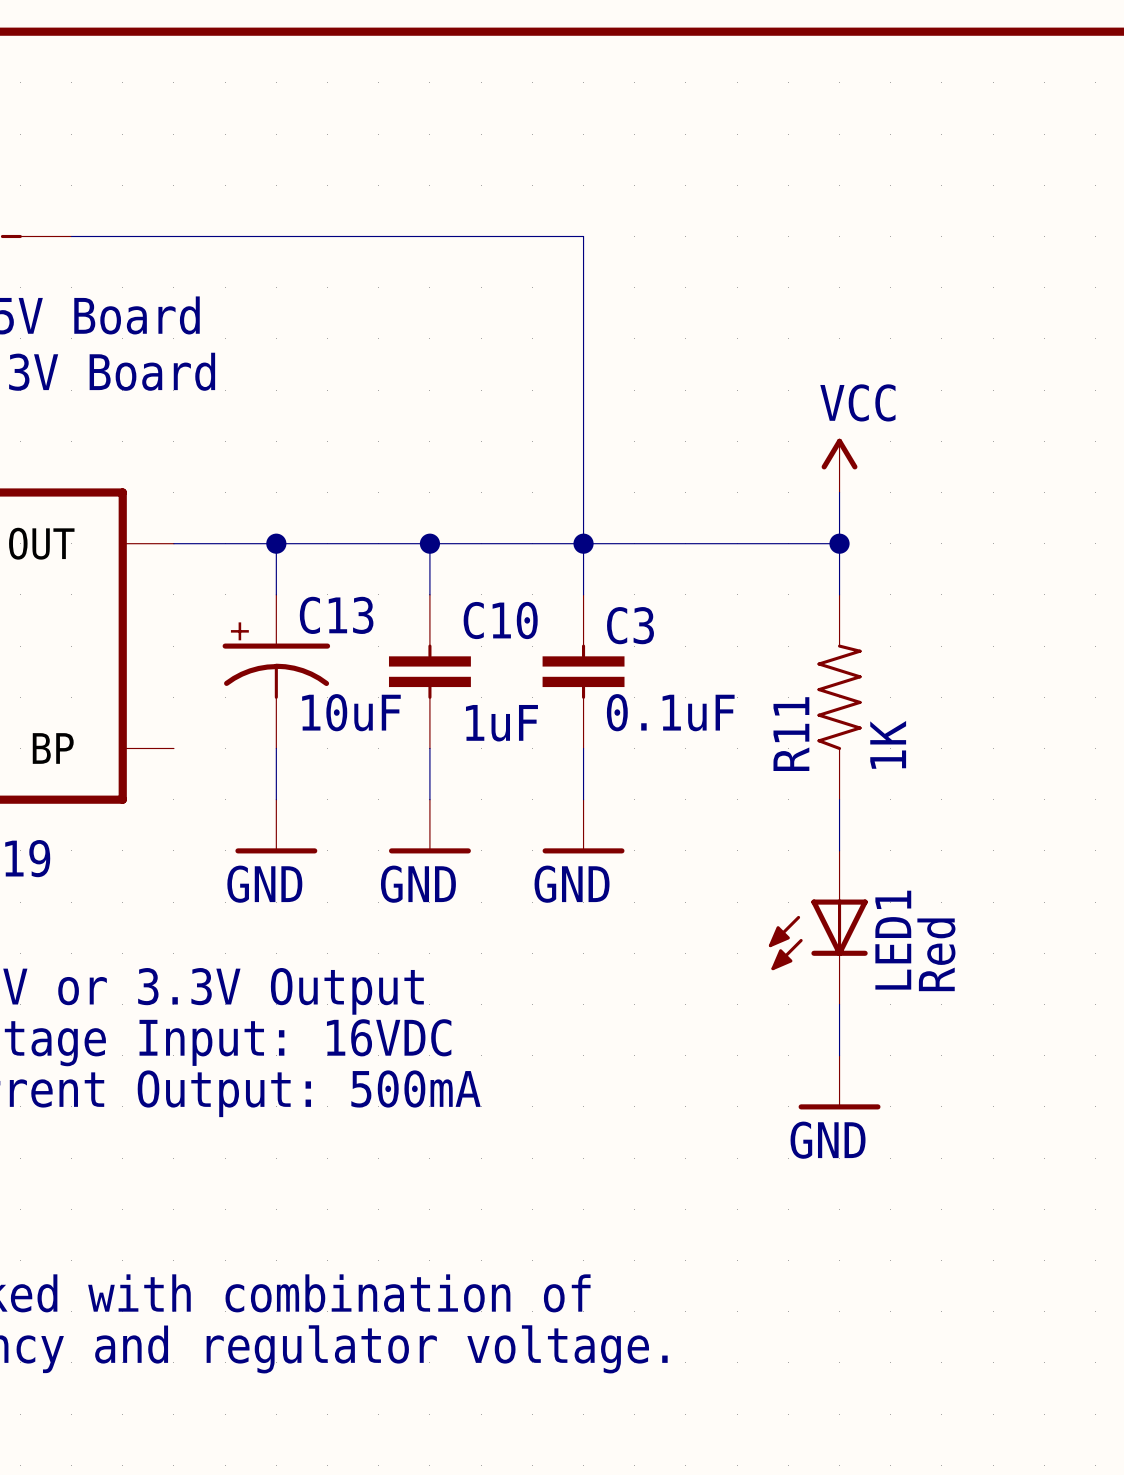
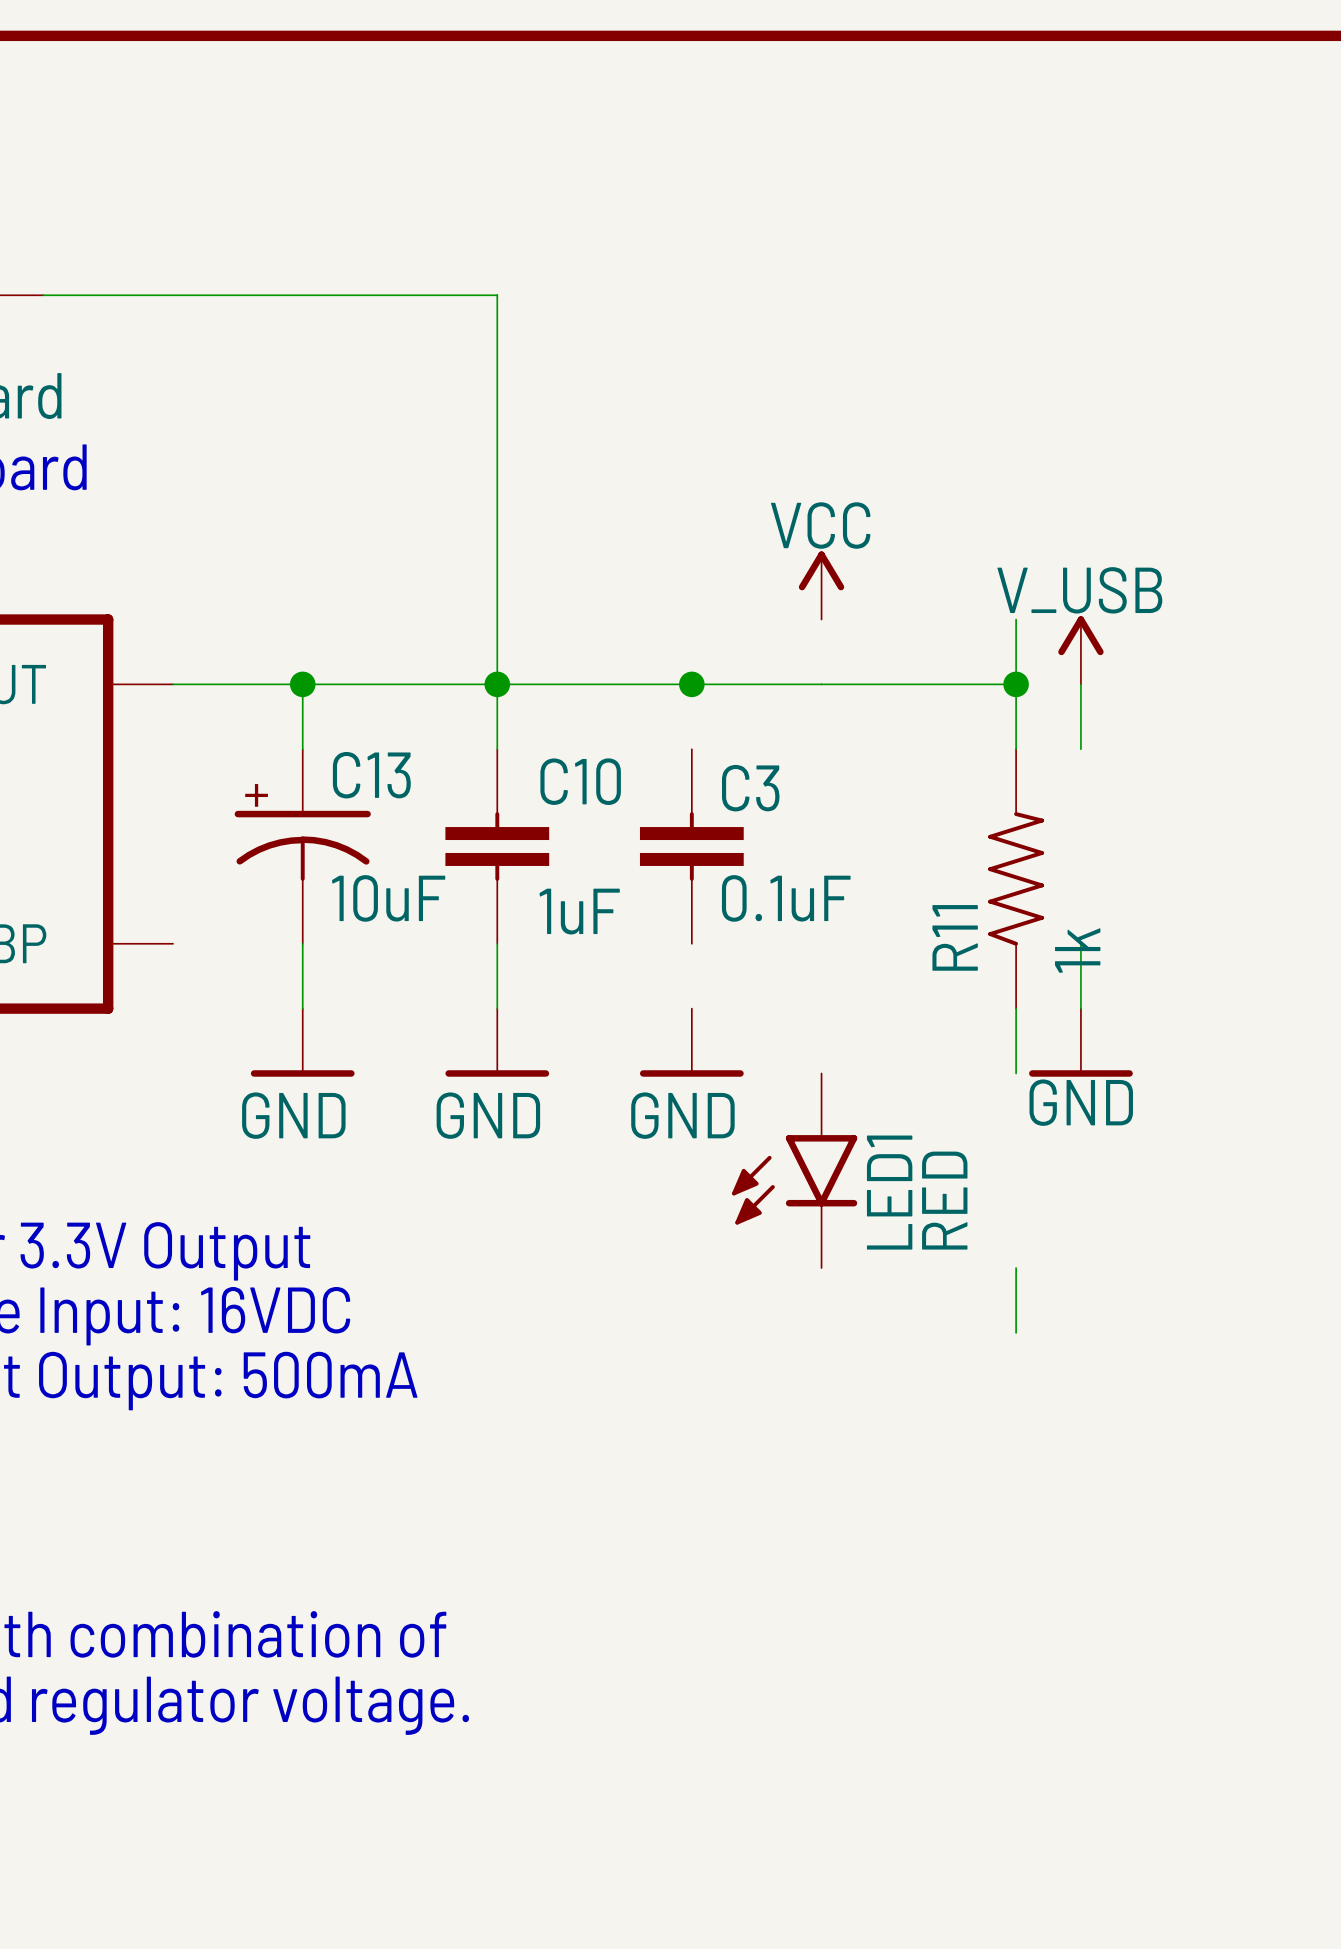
wire: (429, 236) (583, 236) (583, 594) -> (497, 295) (497, 684)
power symbol text position: VCC (857, 402) -> VCC (820, 525)
power symbol position: VCC (839, 465) -> VCC (821, 585)
power symbol: none -> V_USB (1080, 650)
wire: none -> (1080, 684) (1080, 749)
R11 value: 1K (888, 744) -> 1k (1077, 950)
wire: (583, 748) (583, 799) -> (1080, 943) (1080, 1008)
LED1 symbol: [768, 850, 868, 1005] -> [732, 1073, 858, 1269]
LED1 value: Red (936, 954) -> RED (944, 1200)
power symbol position: GND (839, 1082) -> GND (1080, 1042)
power symbol text position: GND (828, 1140) -> GND (1081, 1102)

